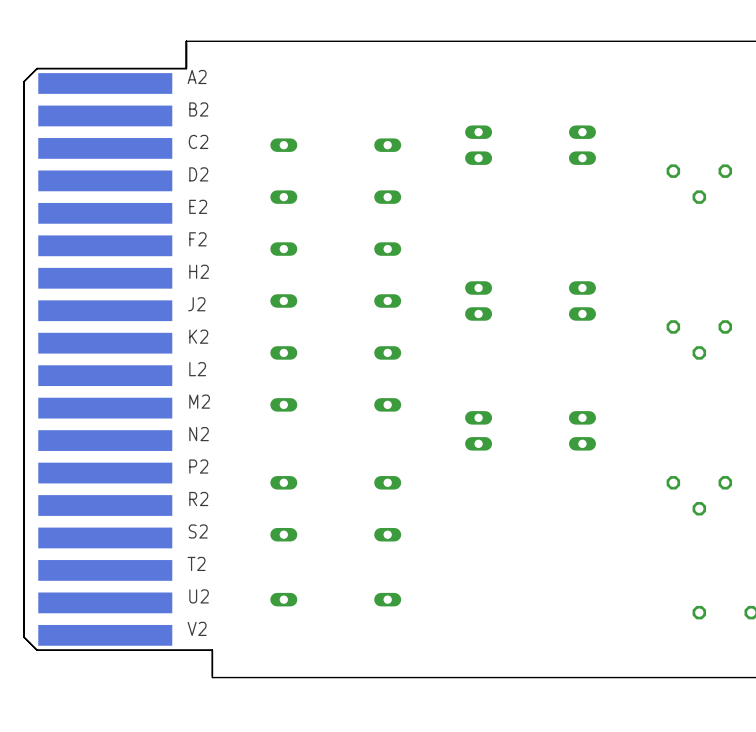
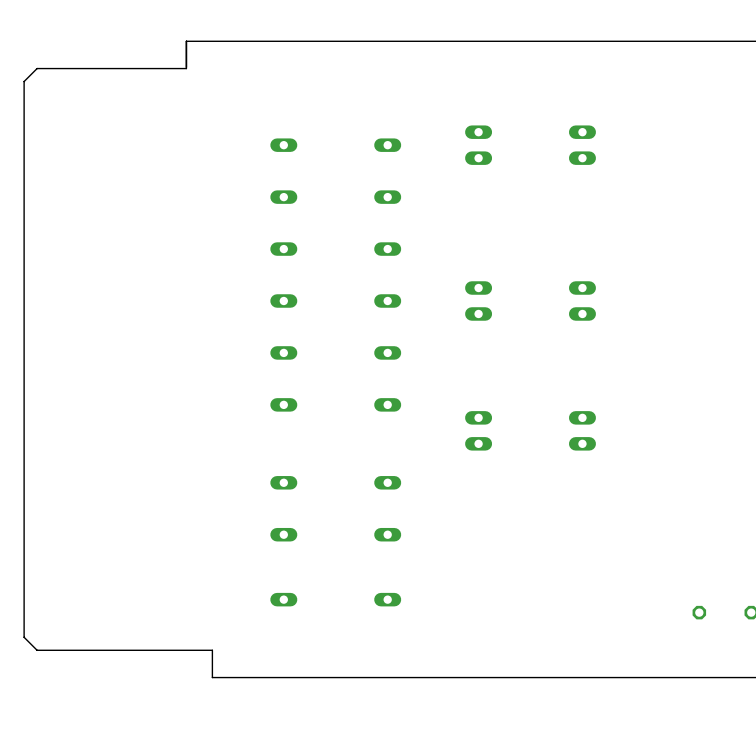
part: (699, 184) -> none
part: (699, 339) -> none
part: (118, 358) -> none
part: (699, 495) -> none

